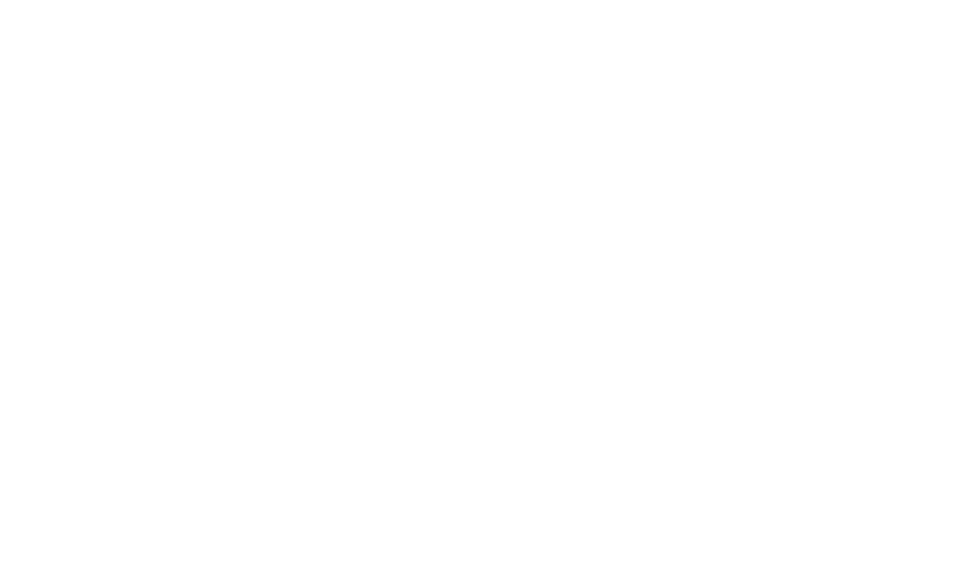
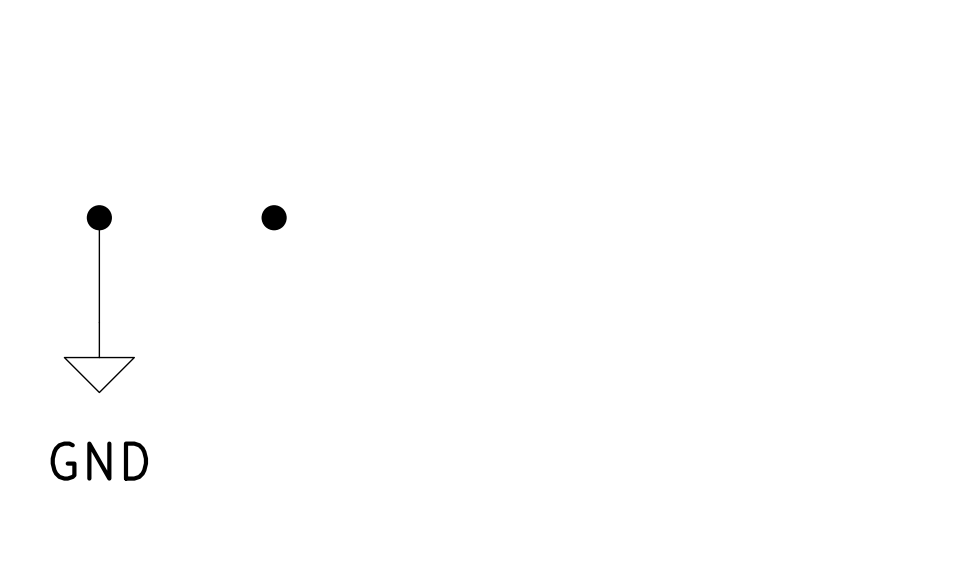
wire: none -> (99, 217) (99, 322)
junction: none -> (99, 217)
junction: none -> (274, 217)
power symbol: none -> GND (99, 357)

